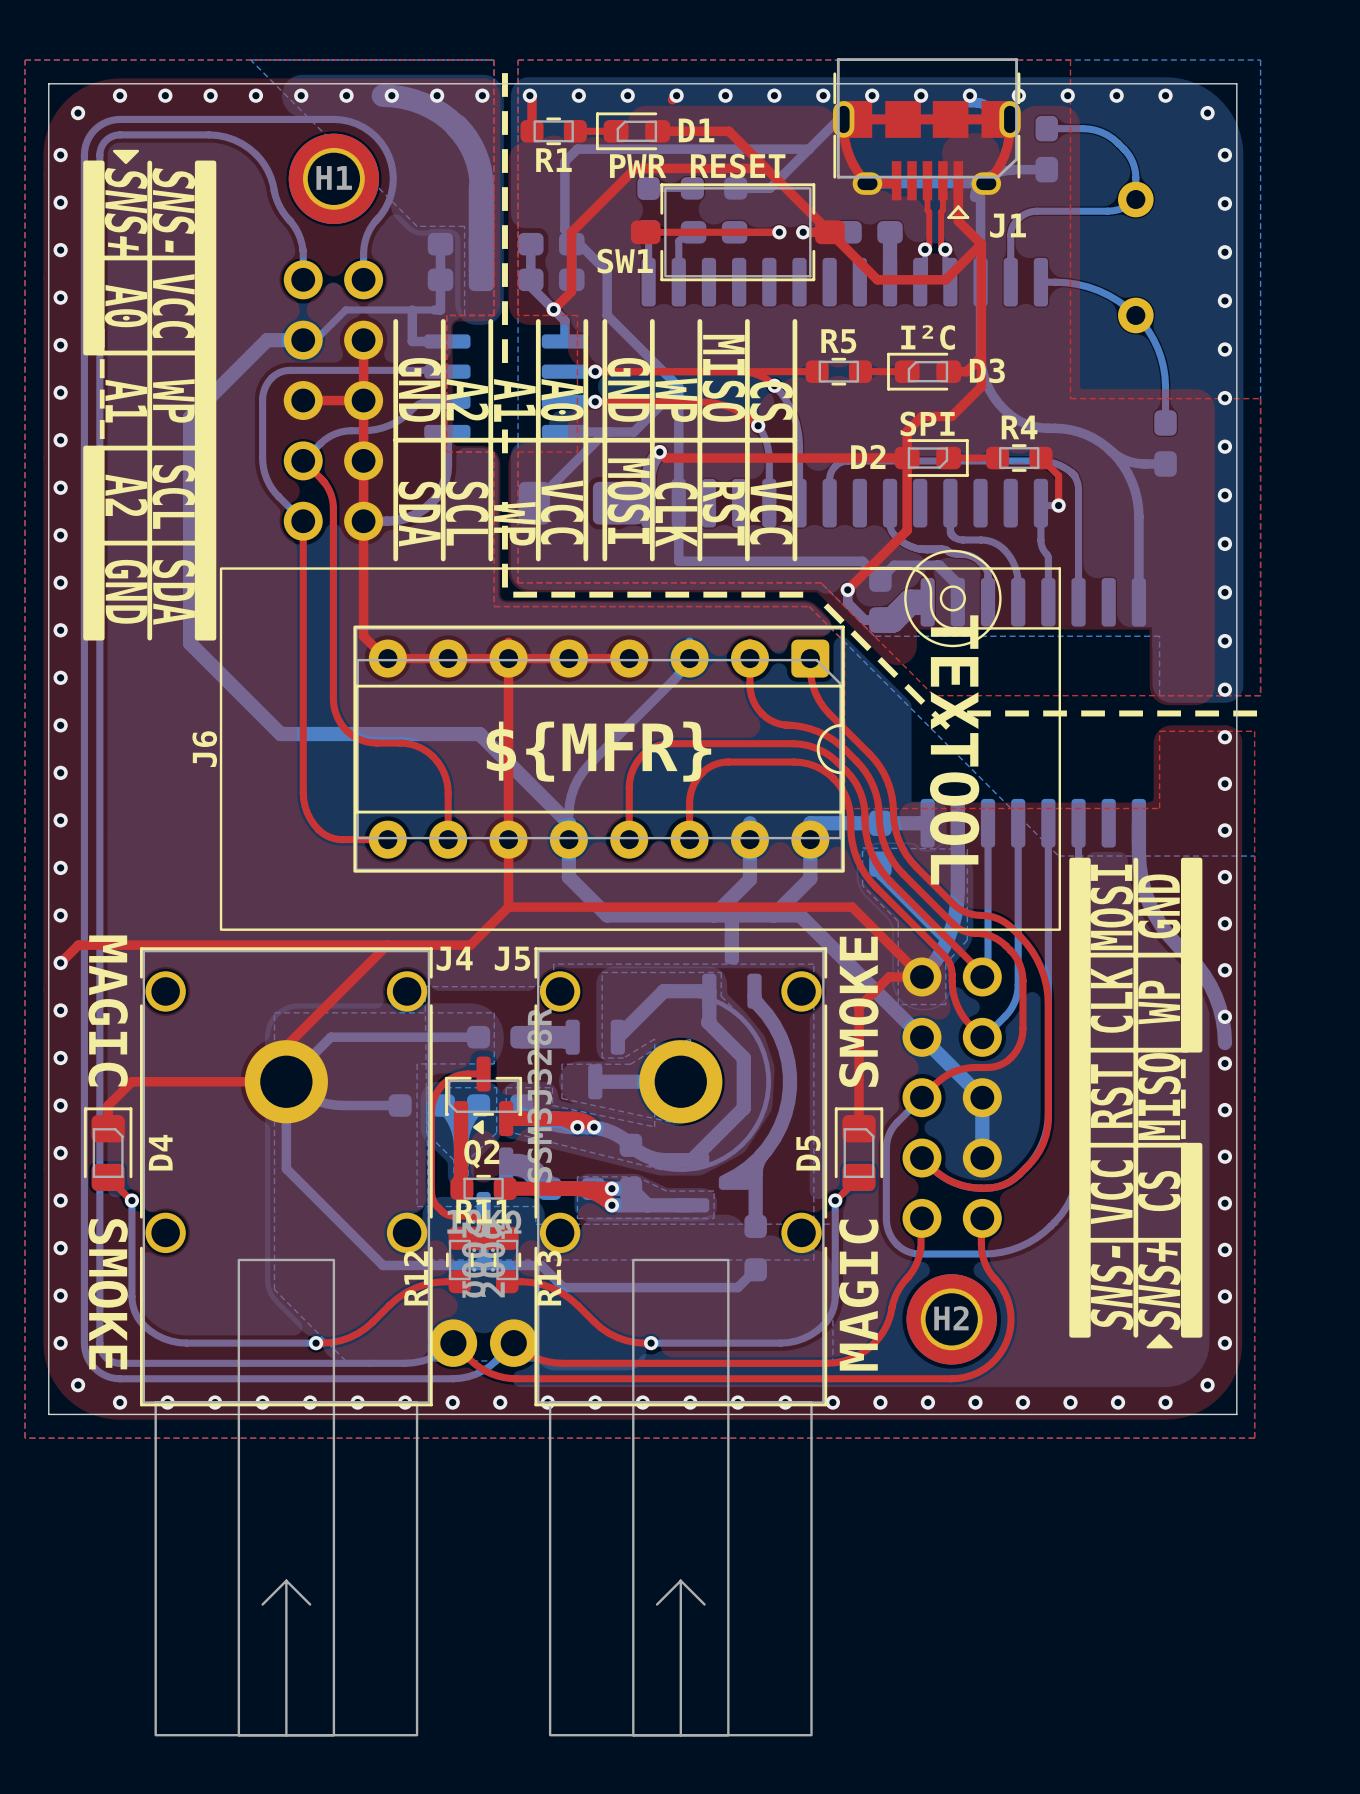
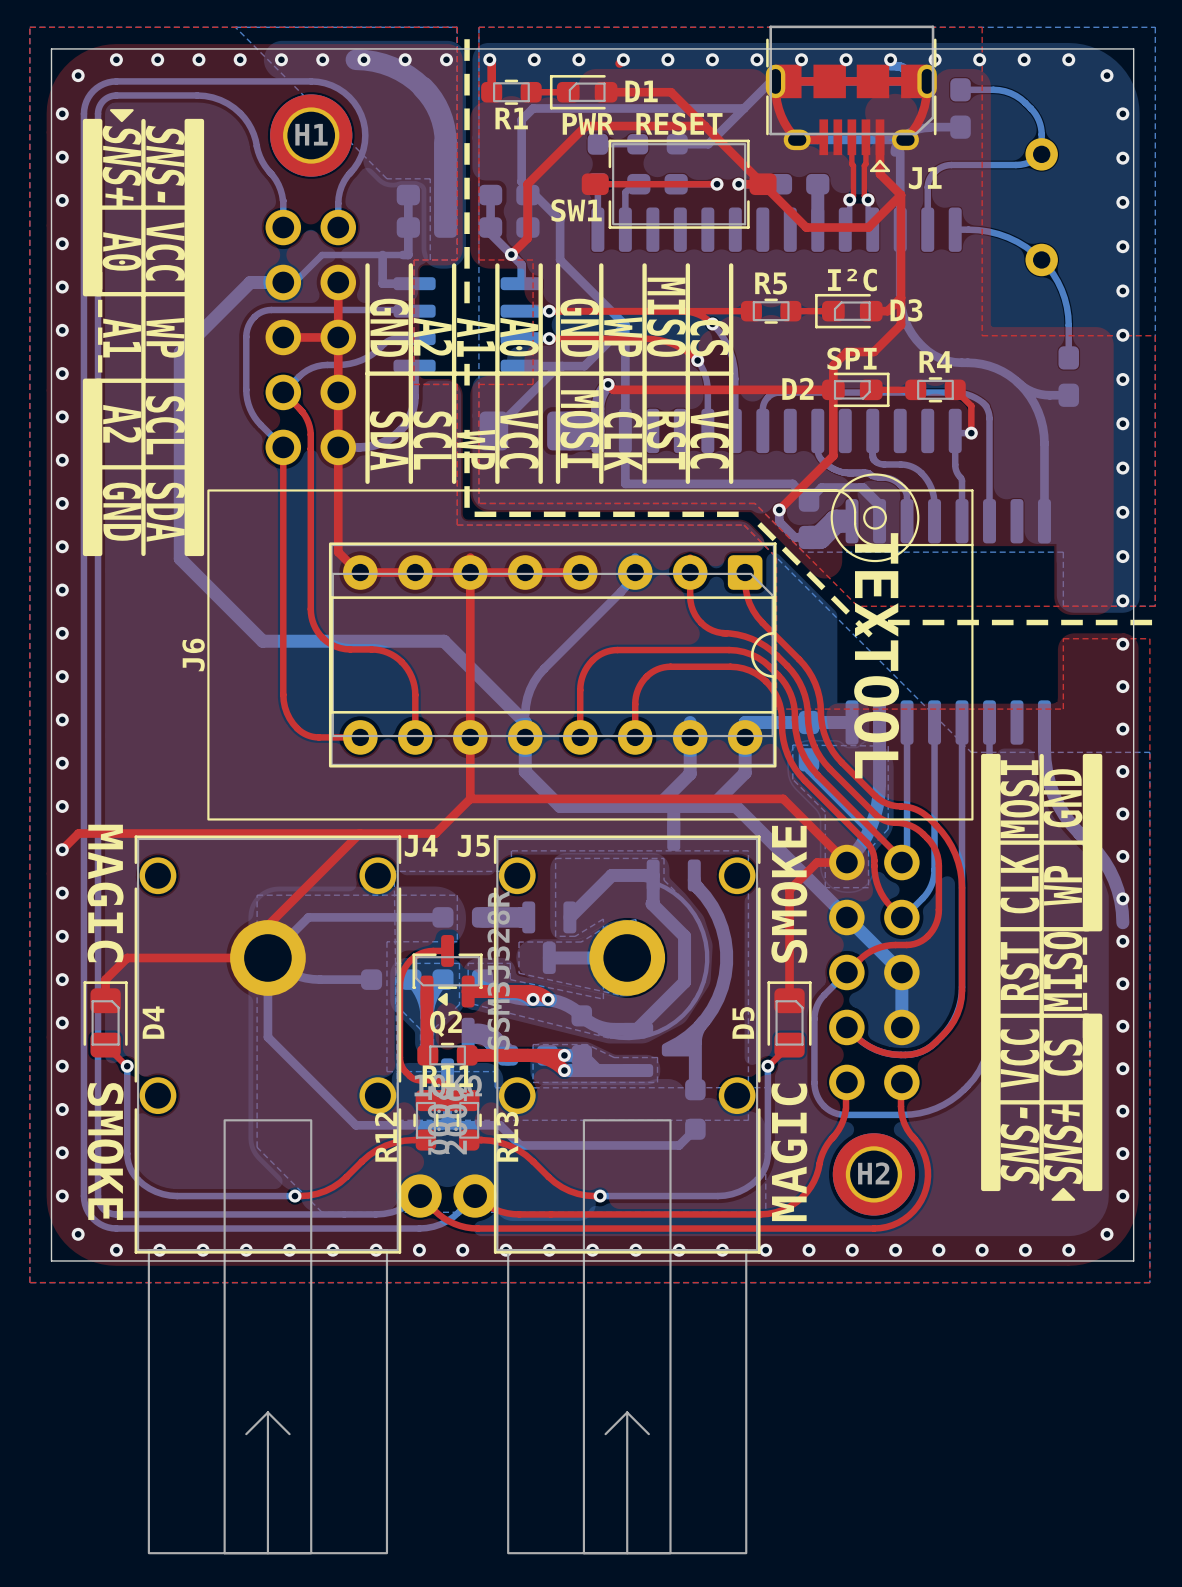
text: ${MFR} (598, 751) -> none

